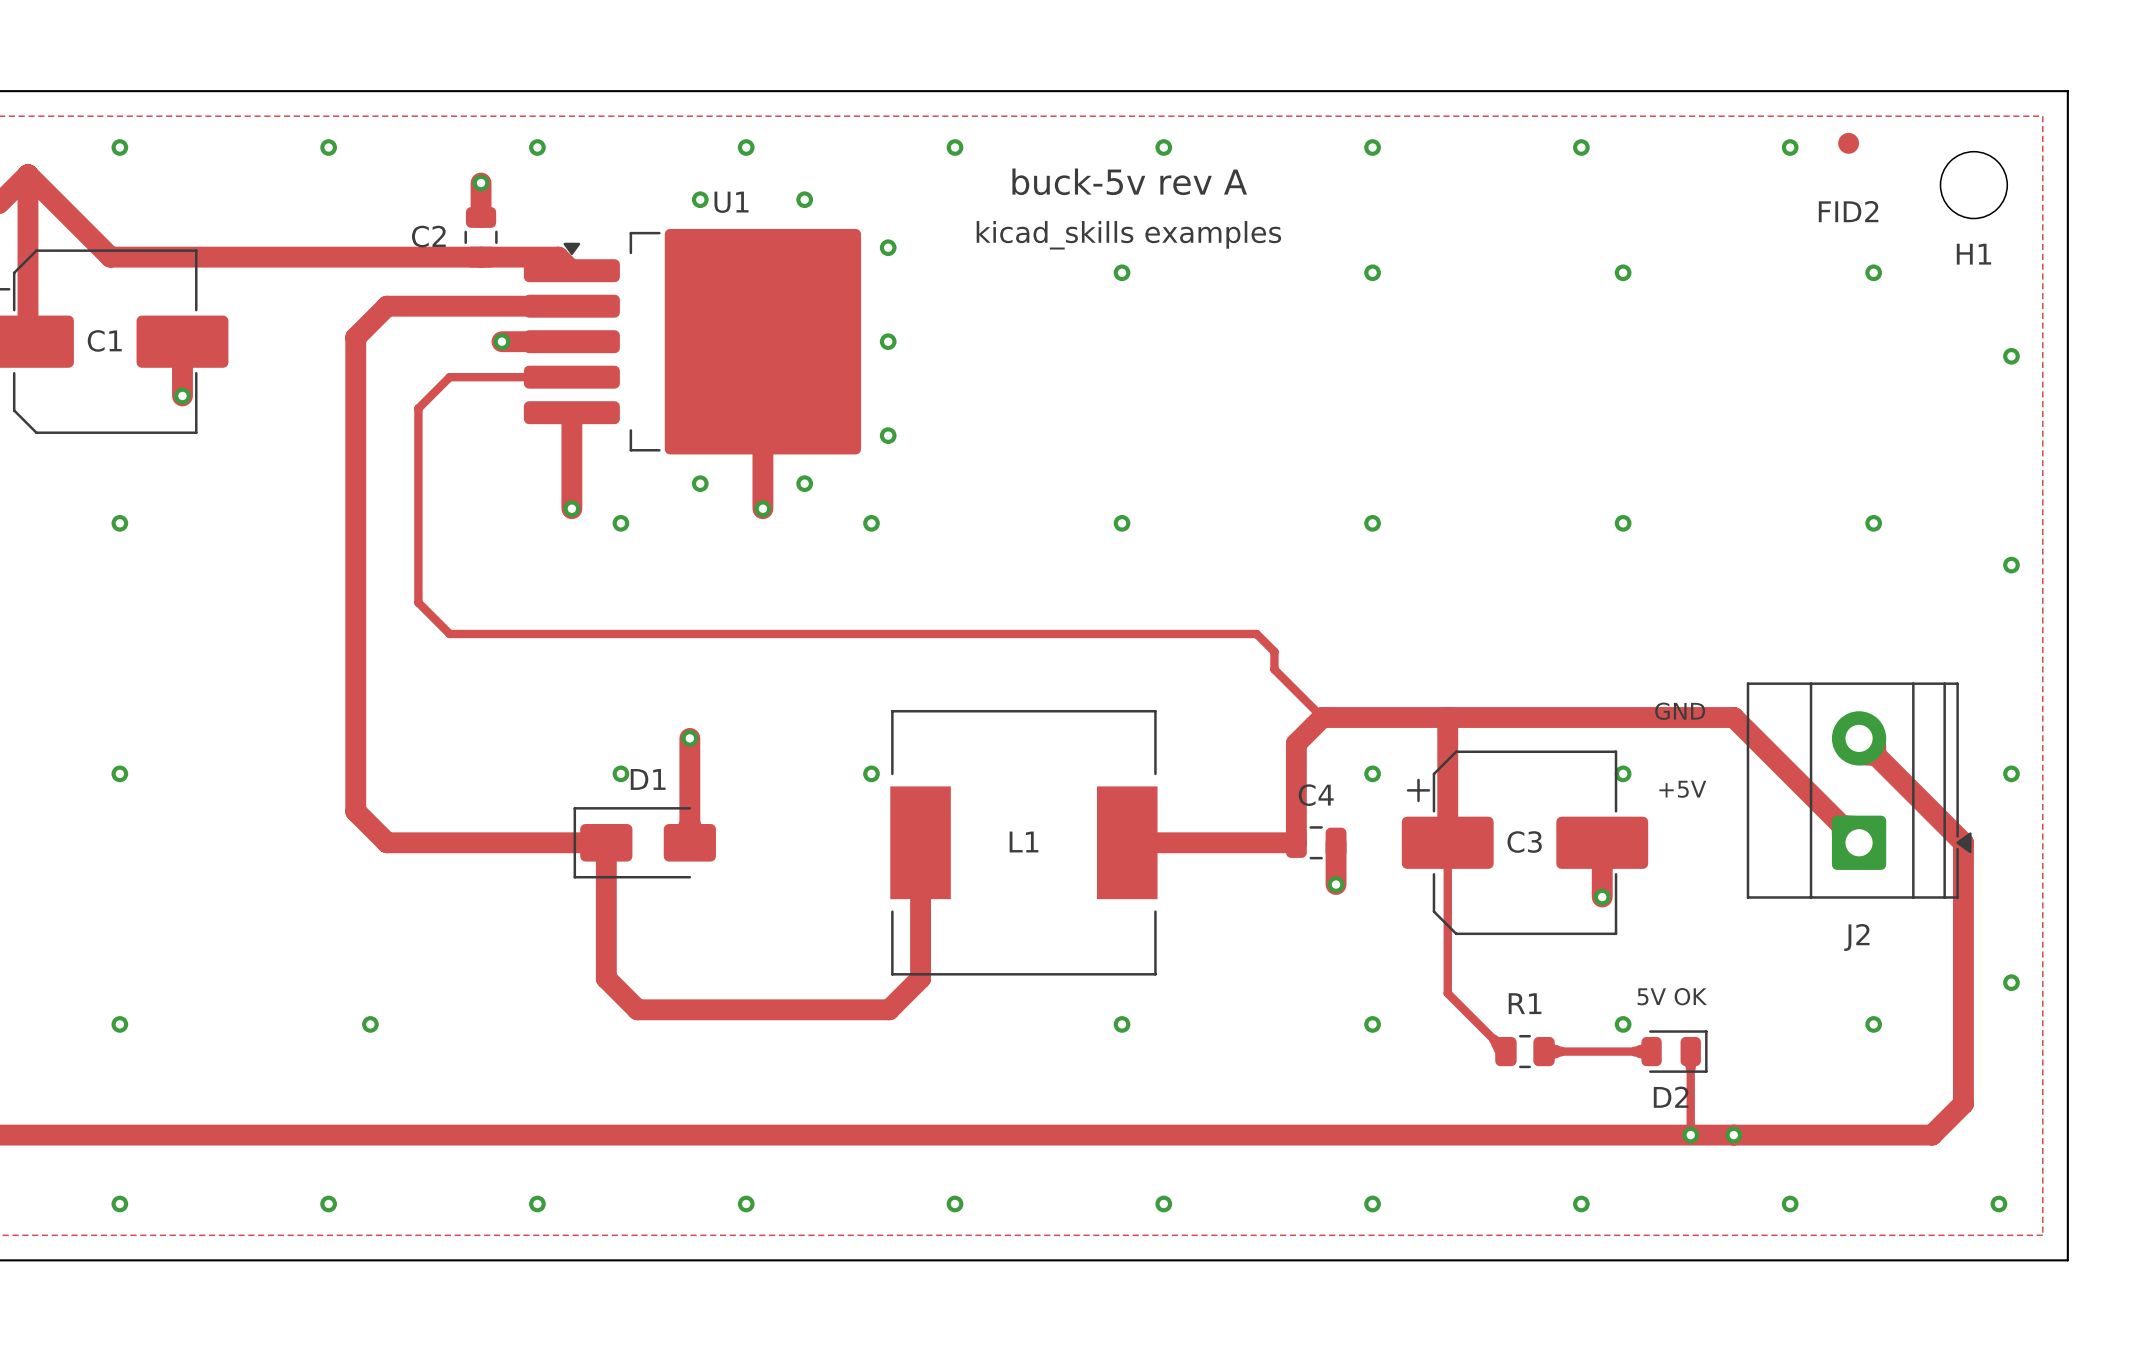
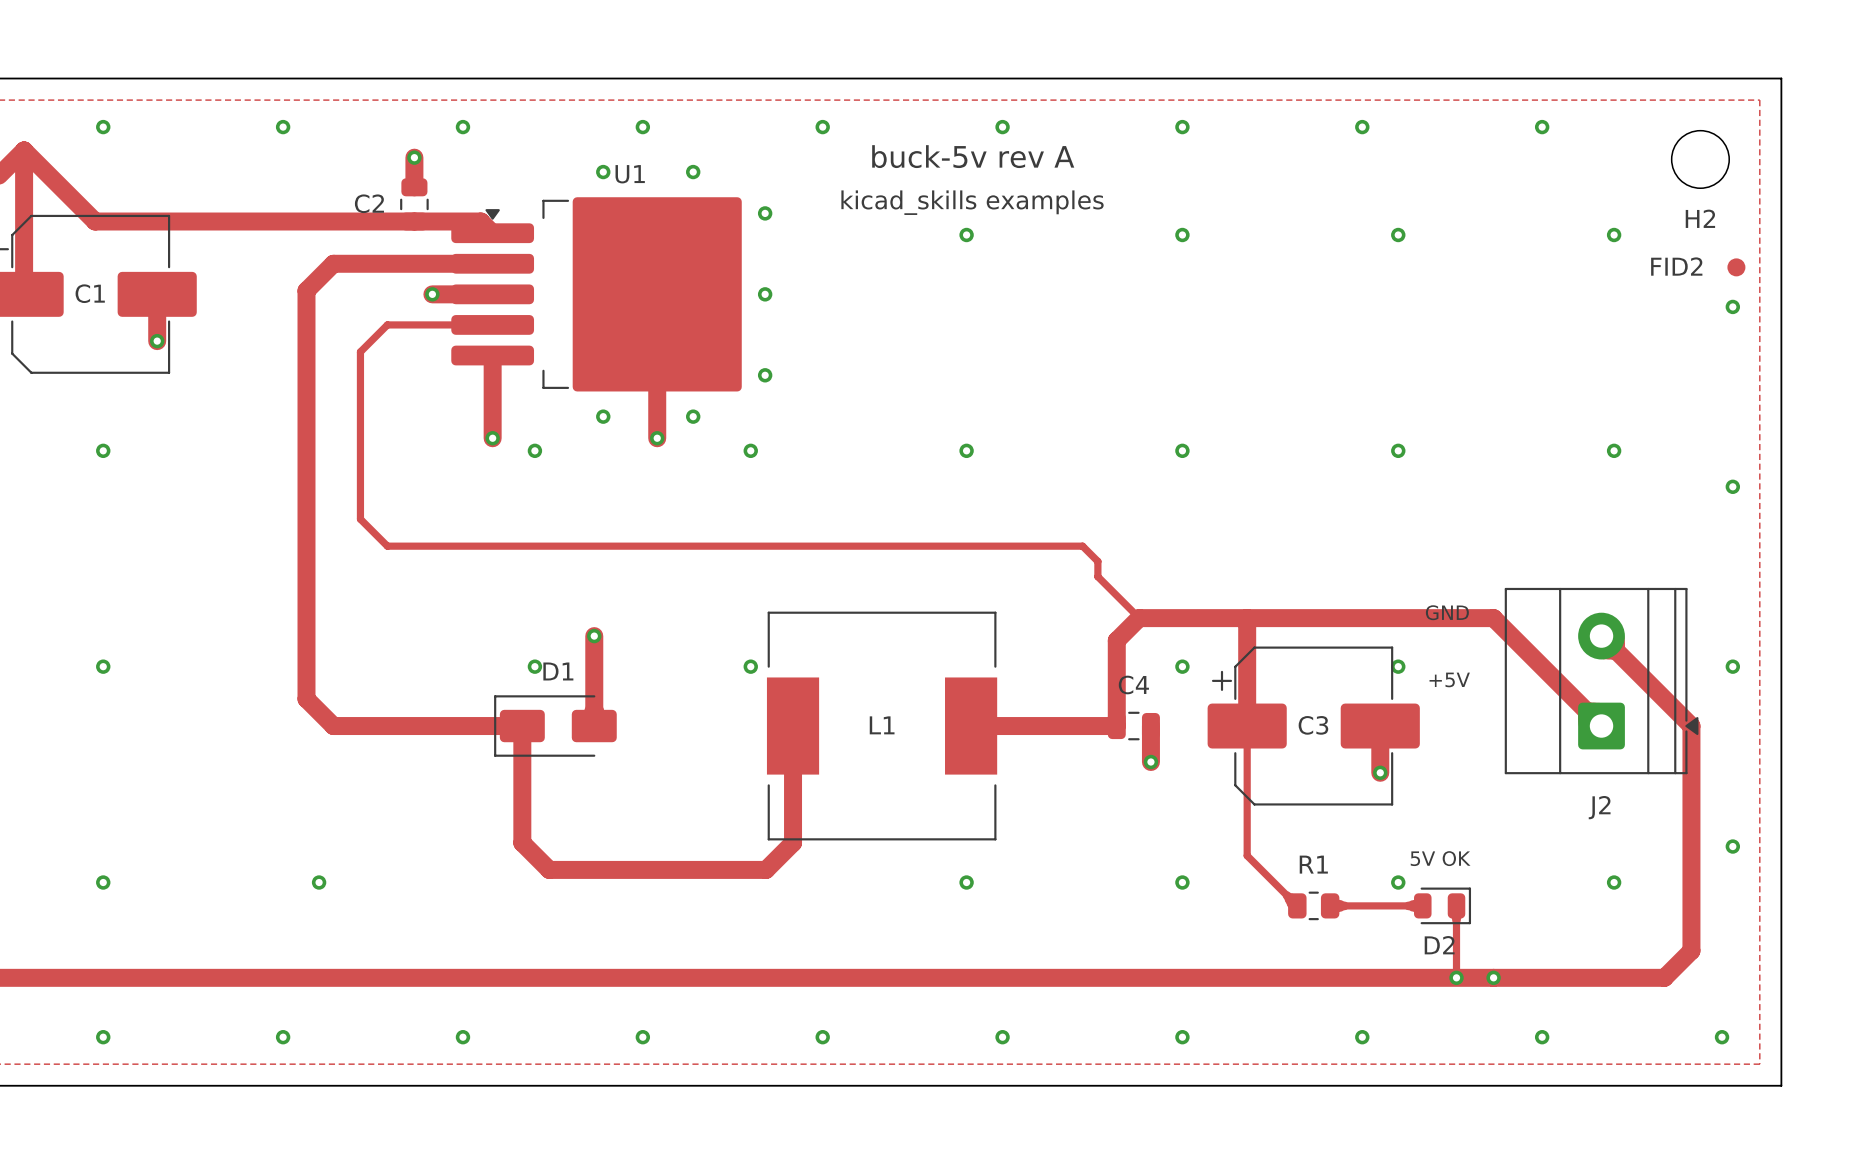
FID2 position: (1848, 143) -> (1736, 267)
FID2 name position: FID2 (1848, 211) -> FID2 (1676, 266)
H1 name: H1 (1973, 254) -> H2 (1700, 218)

